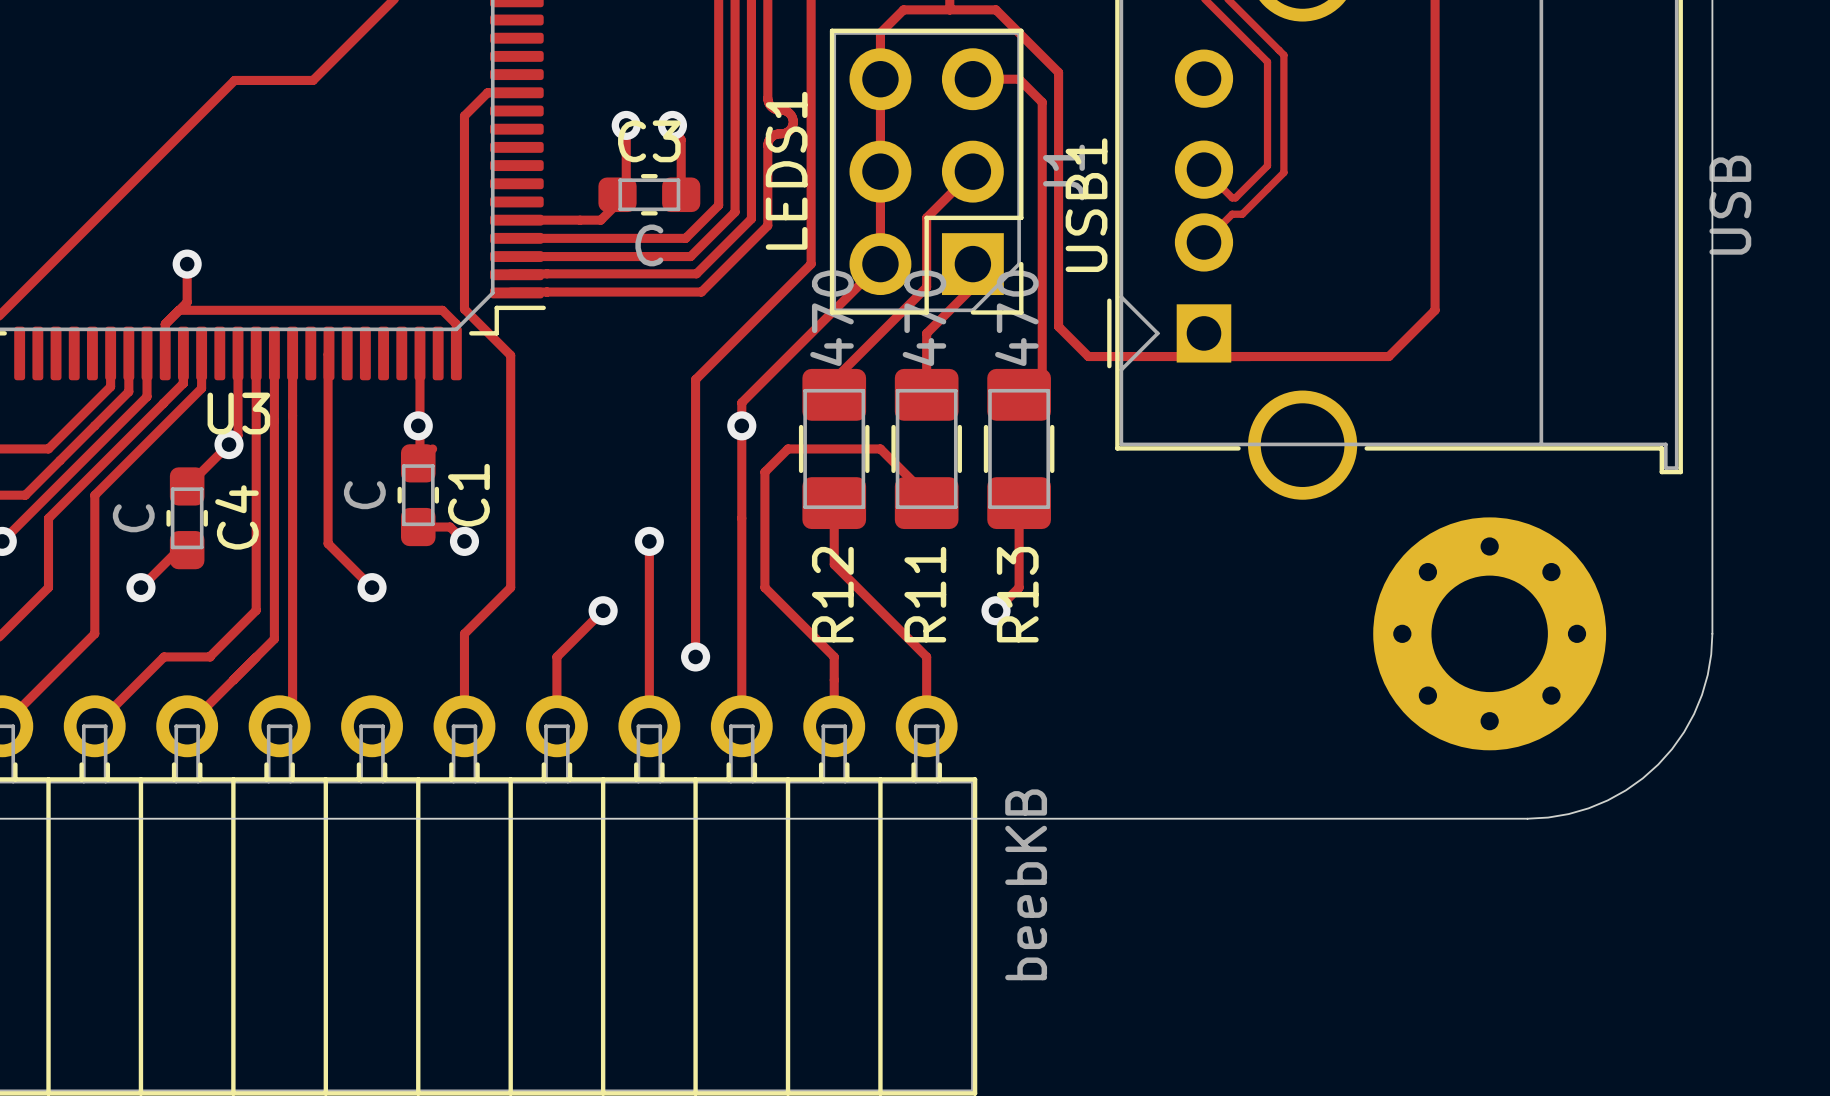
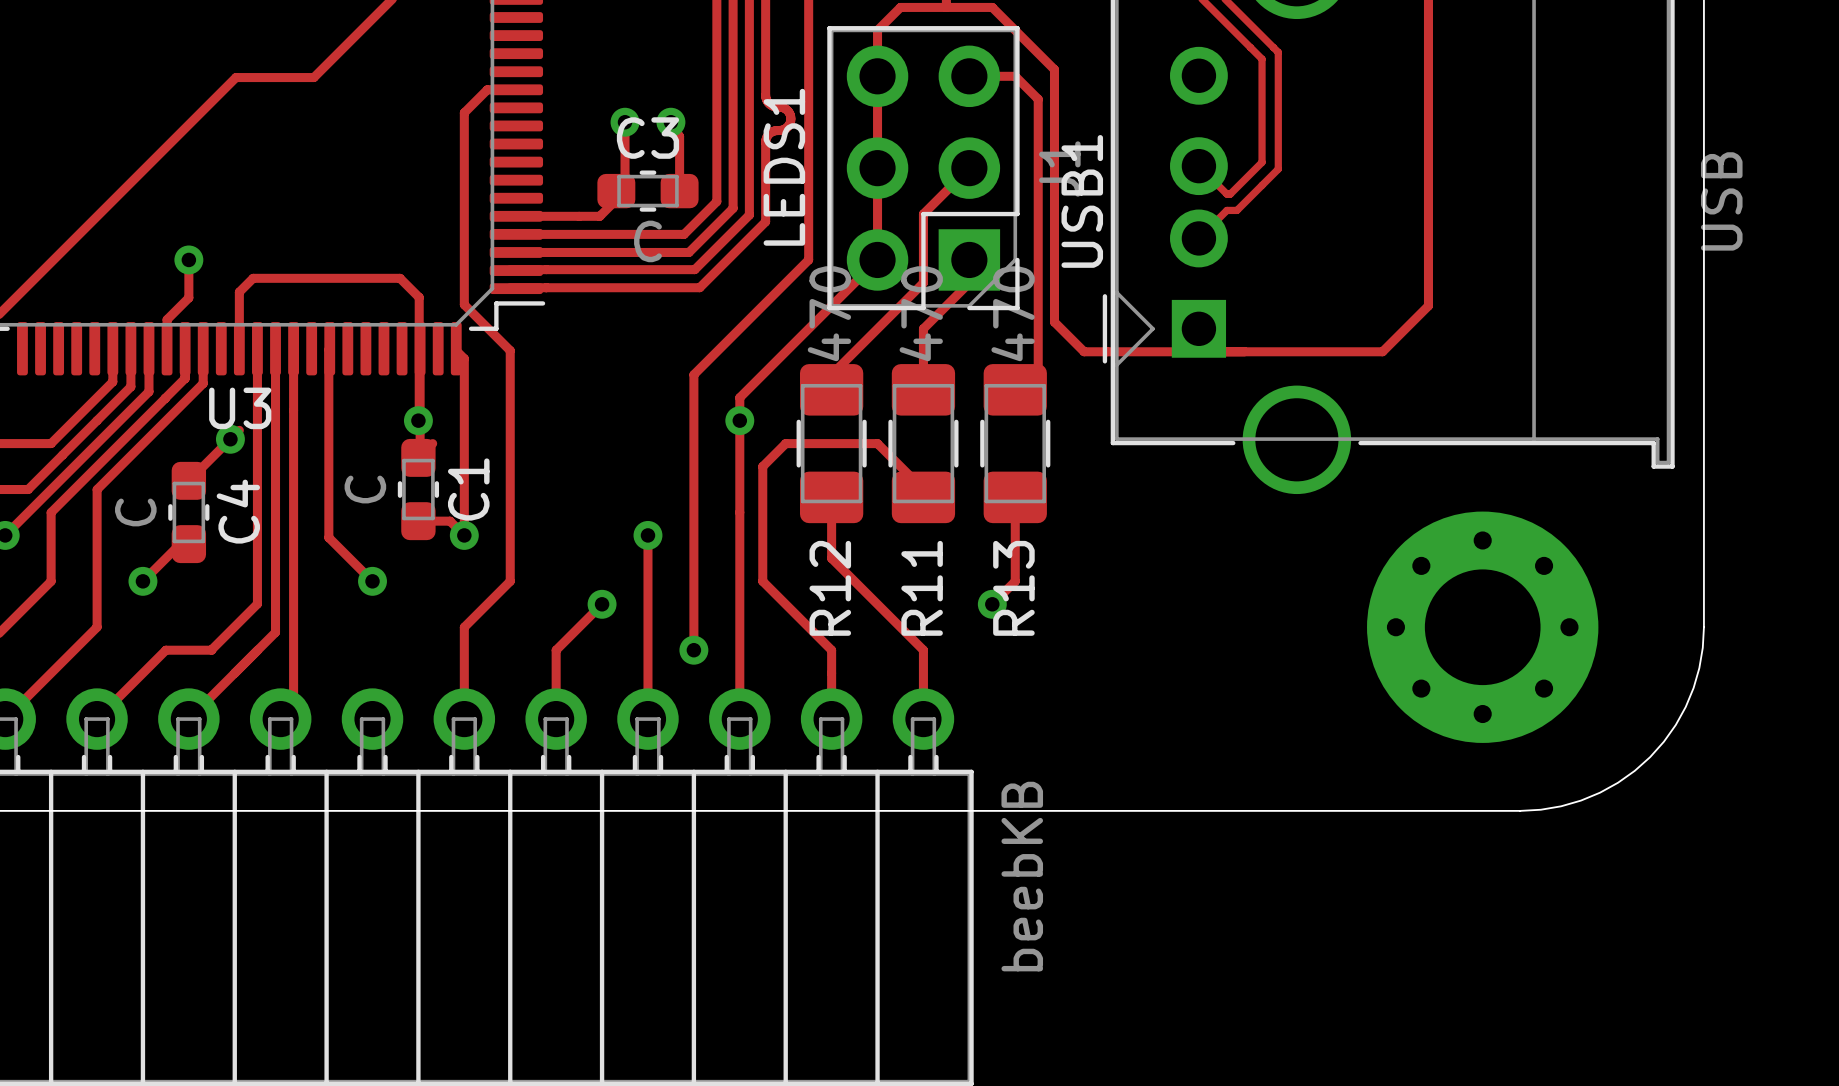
track: (179, 310) (442, 310) (456, 324) (456, 353) -> (464, 535) (464, 358) (456, 348)
track: (238, 353) (238, 435) -> (239, 348) (239, 292) (253, 278) (400, 278) (419, 297) (418, 420)

